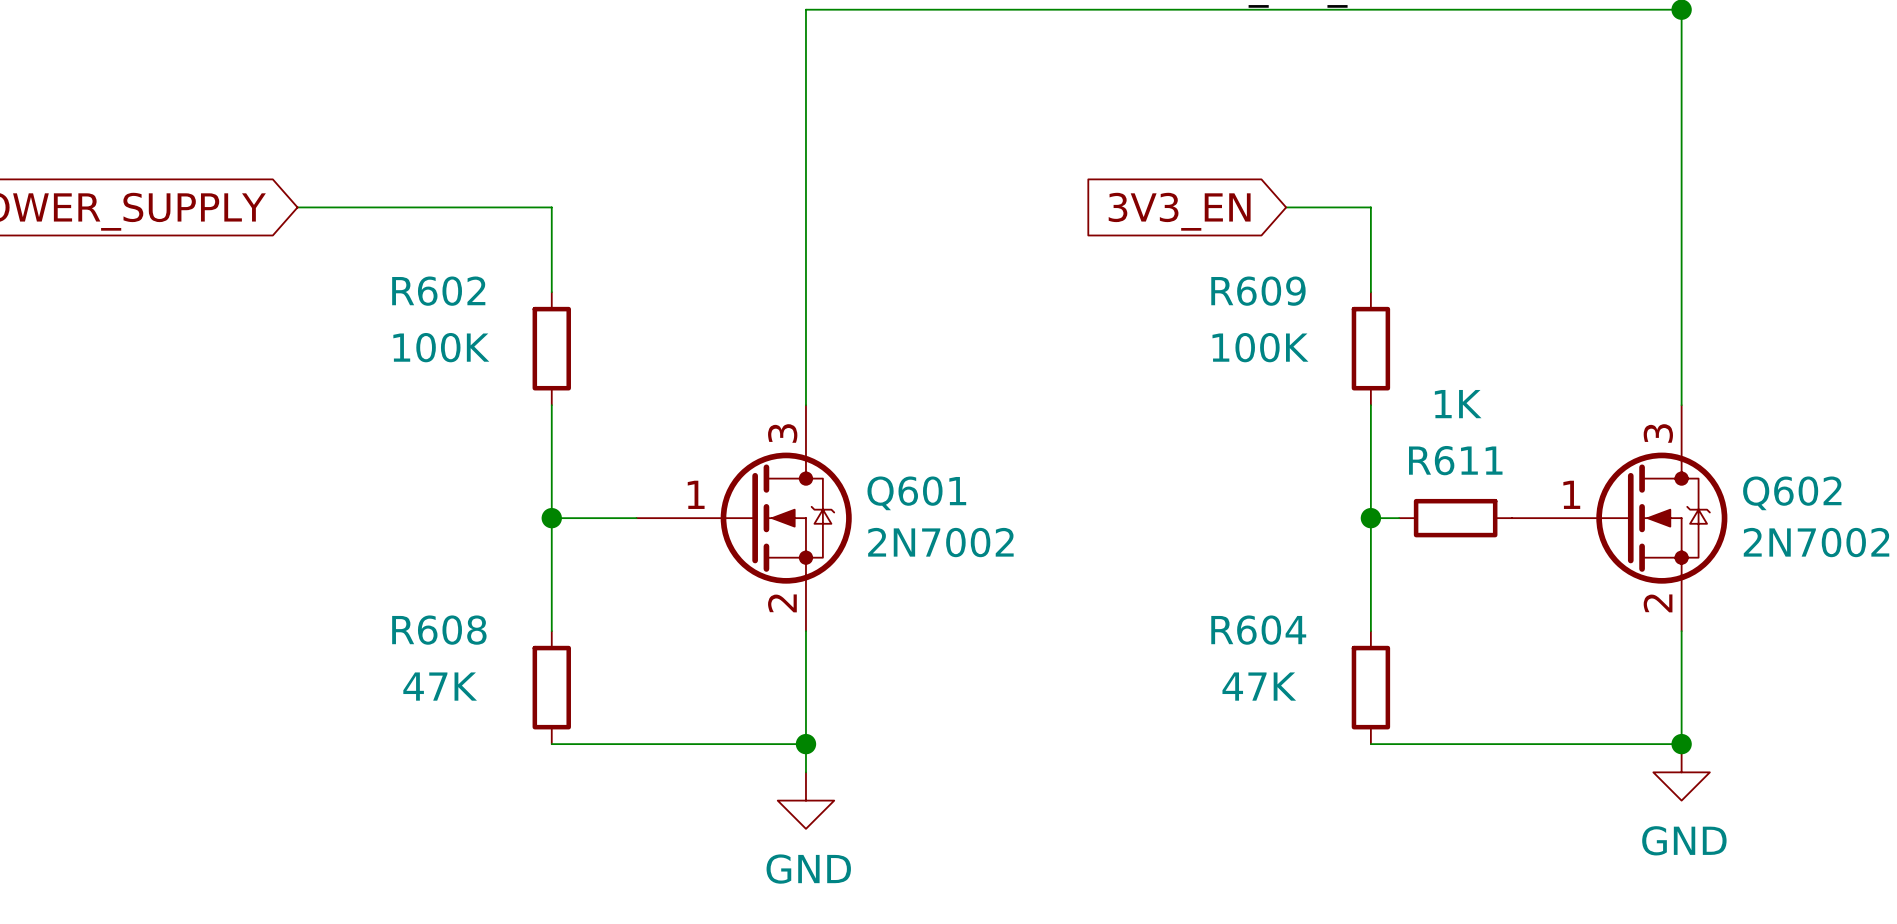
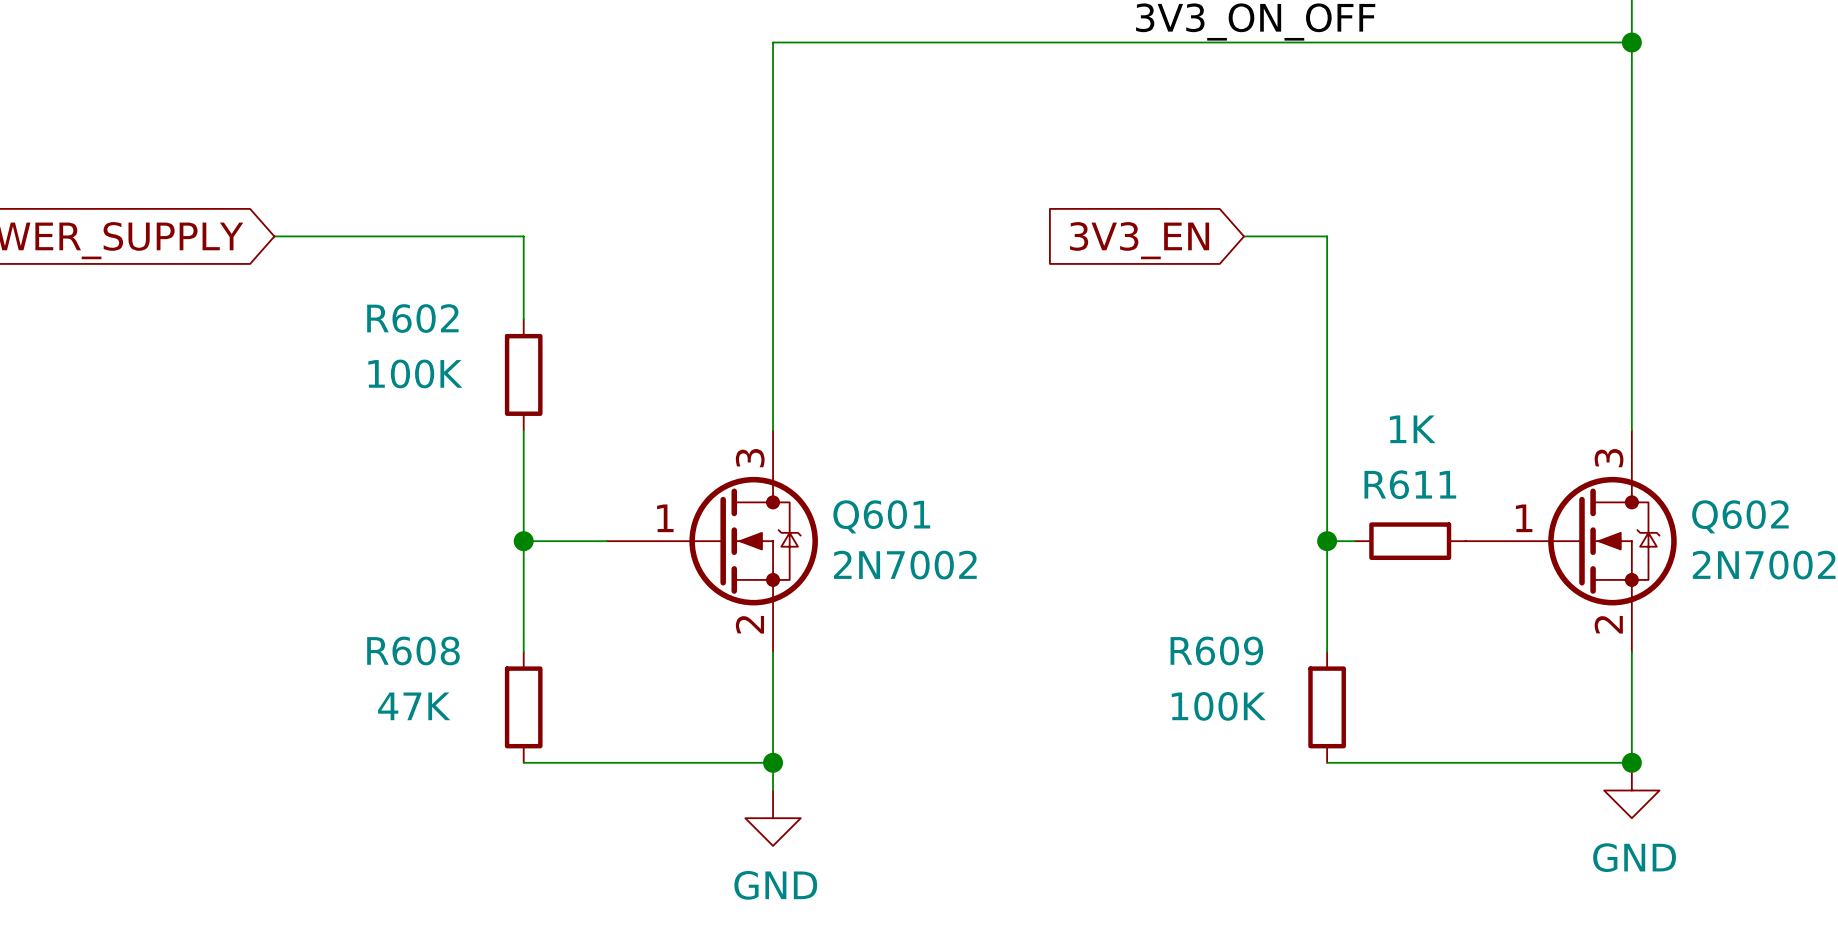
wire: none -> (1327, 319) (1327, 430)
R609: 100K (1370, 348) -> none
R604 name: R604 (1258, 630) -> R609 (1216, 650)
R604 value: 47K (1259, 686) -> 100K (1218, 706)

